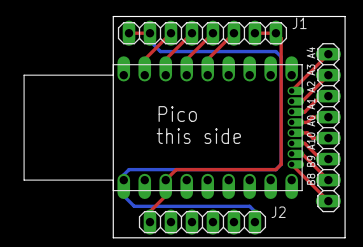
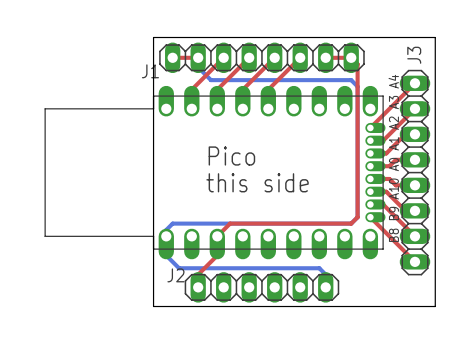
J1 name position: J1 (299, 23) -> J1 (150, 71)
J3 name: none -> J3 (414, 55)
J2 name position: J2 (278, 212) -> J2 (175, 275)

